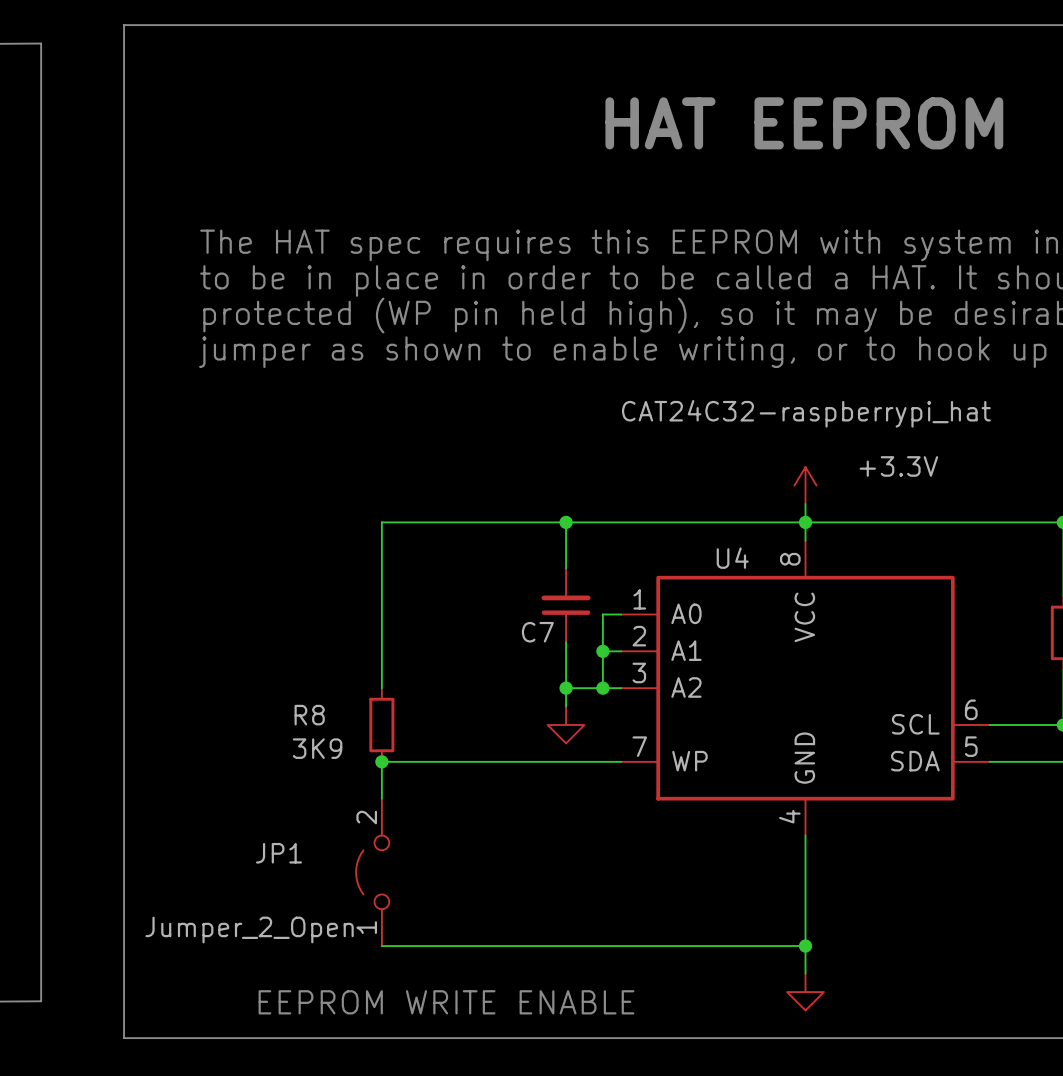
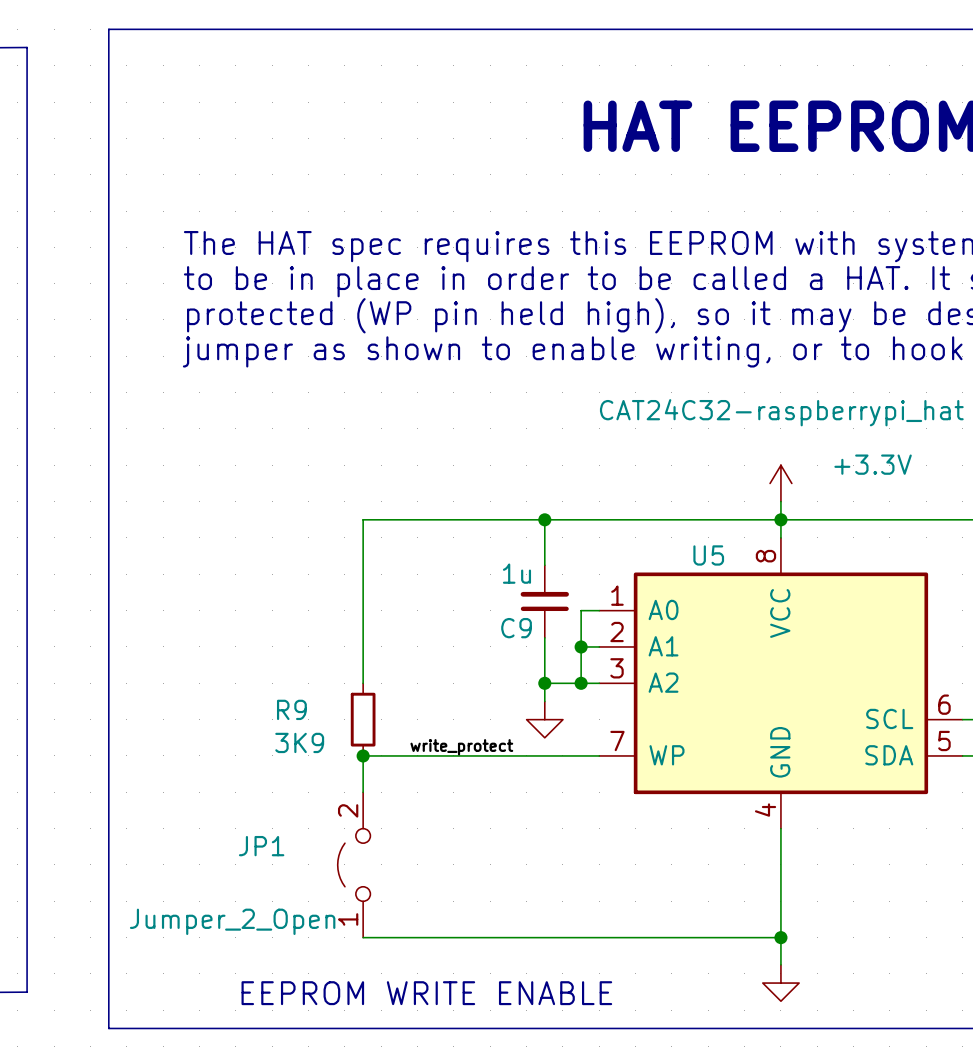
U4 name: U4 (732, 558) -> U5 (708, 555)
C7 value: none -> 1u (516, 573)
C7 name: C7 (537, 632) -> C9 (516, 628)
R8 name: R8 (309, 715) -> R9 (291, 709)
label: none -> write_protect (461, 747)

